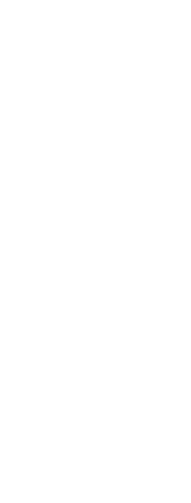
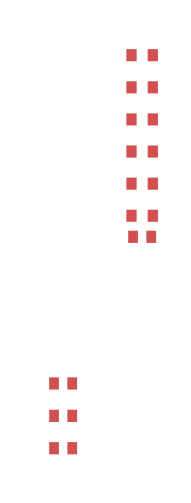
part: none -> (142, 55)
part: none -> (142, 87)
part: none -> (142, 119)
part: none -> (142, 151)
part: none -> (142, 183)
part: none -> (142, 215)
part: none -> (142, 236)
part: none -> (63, 383)
part: none -> (63, 415)
part: none -> (63, 448)

